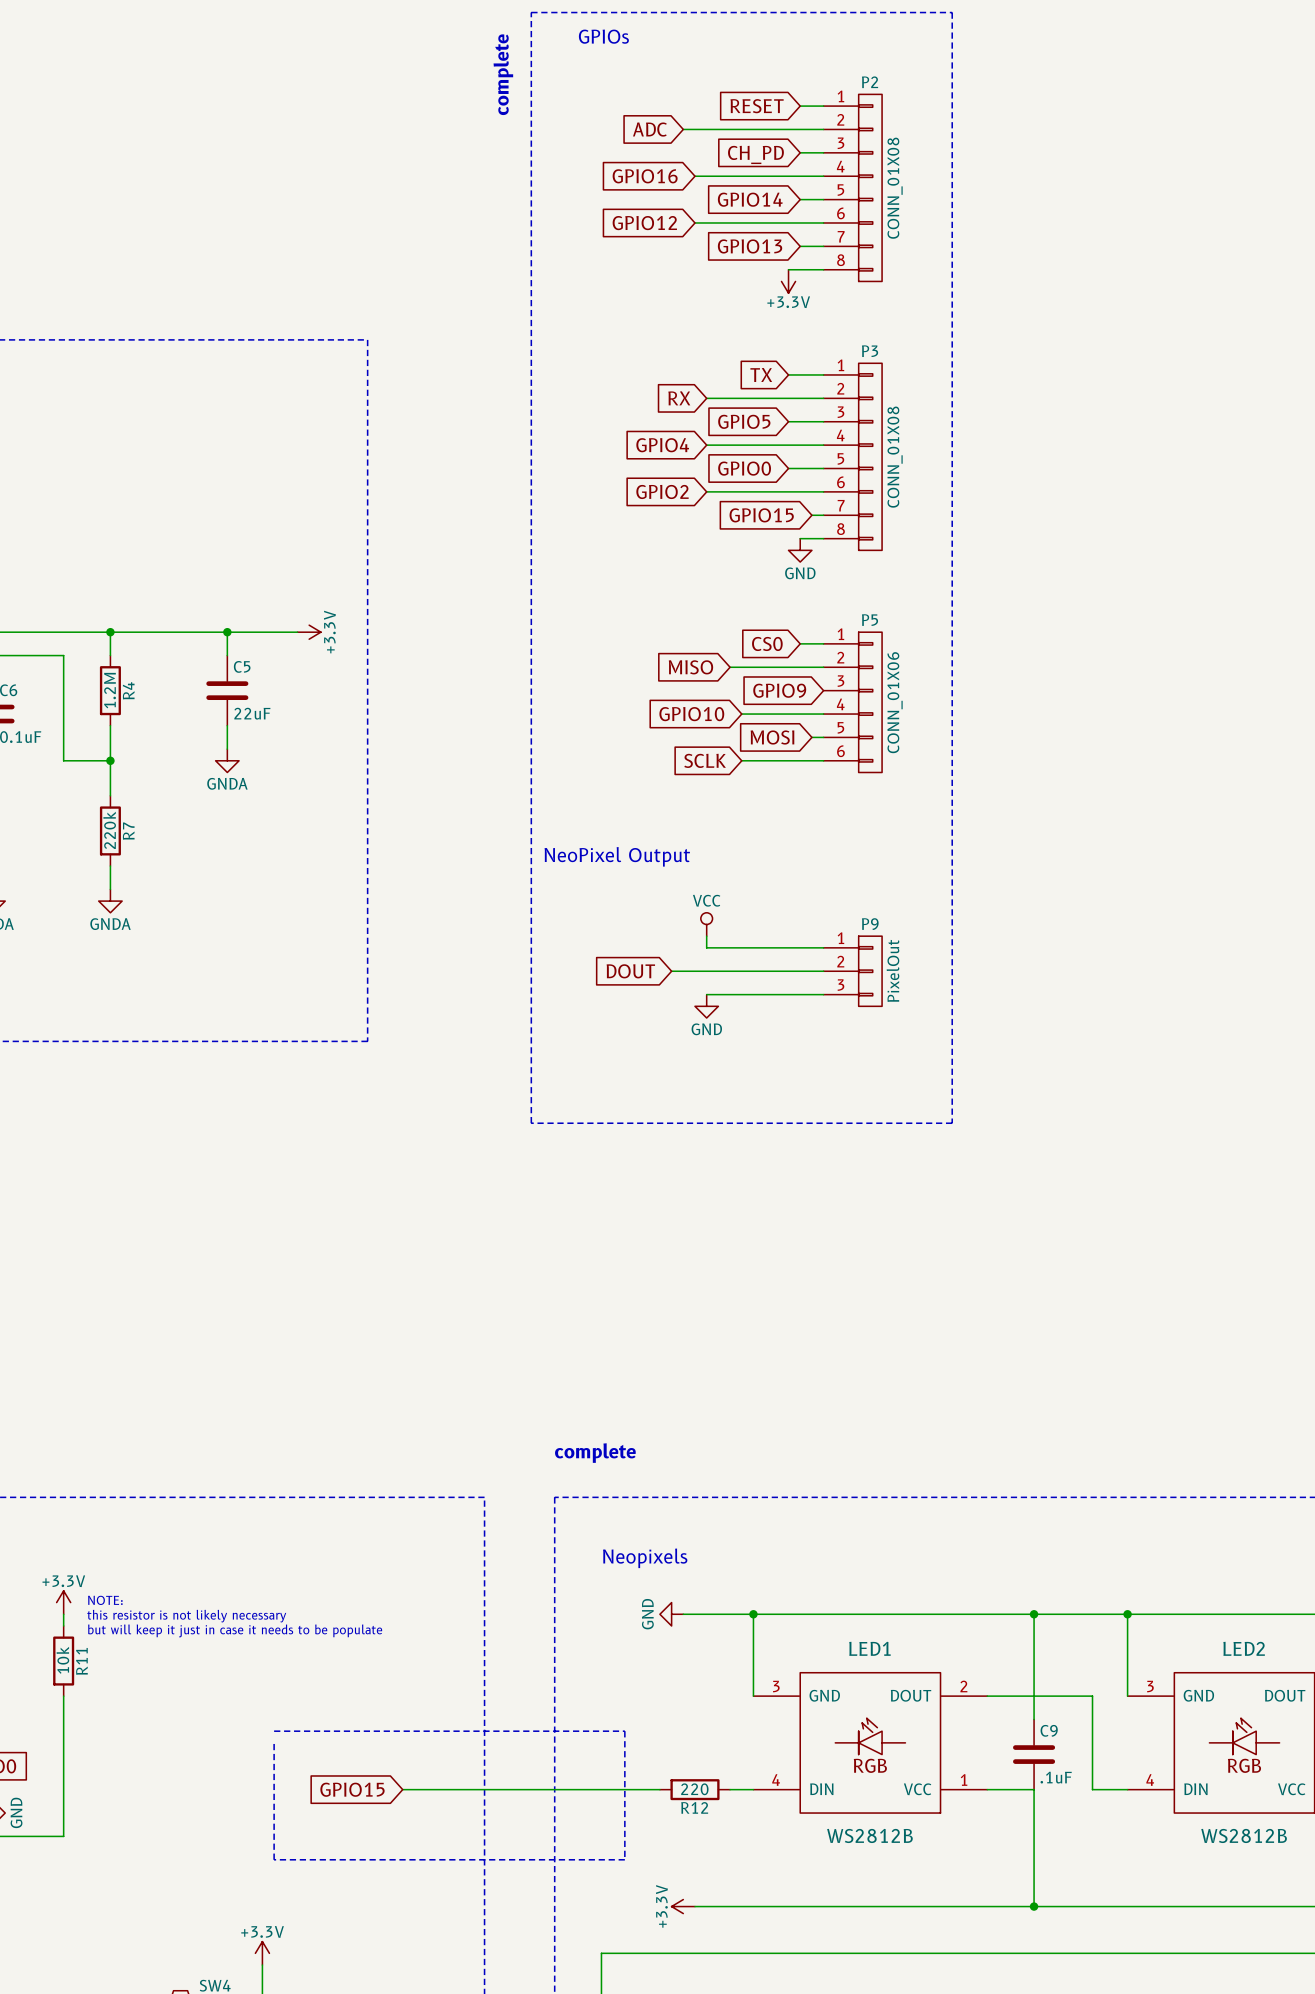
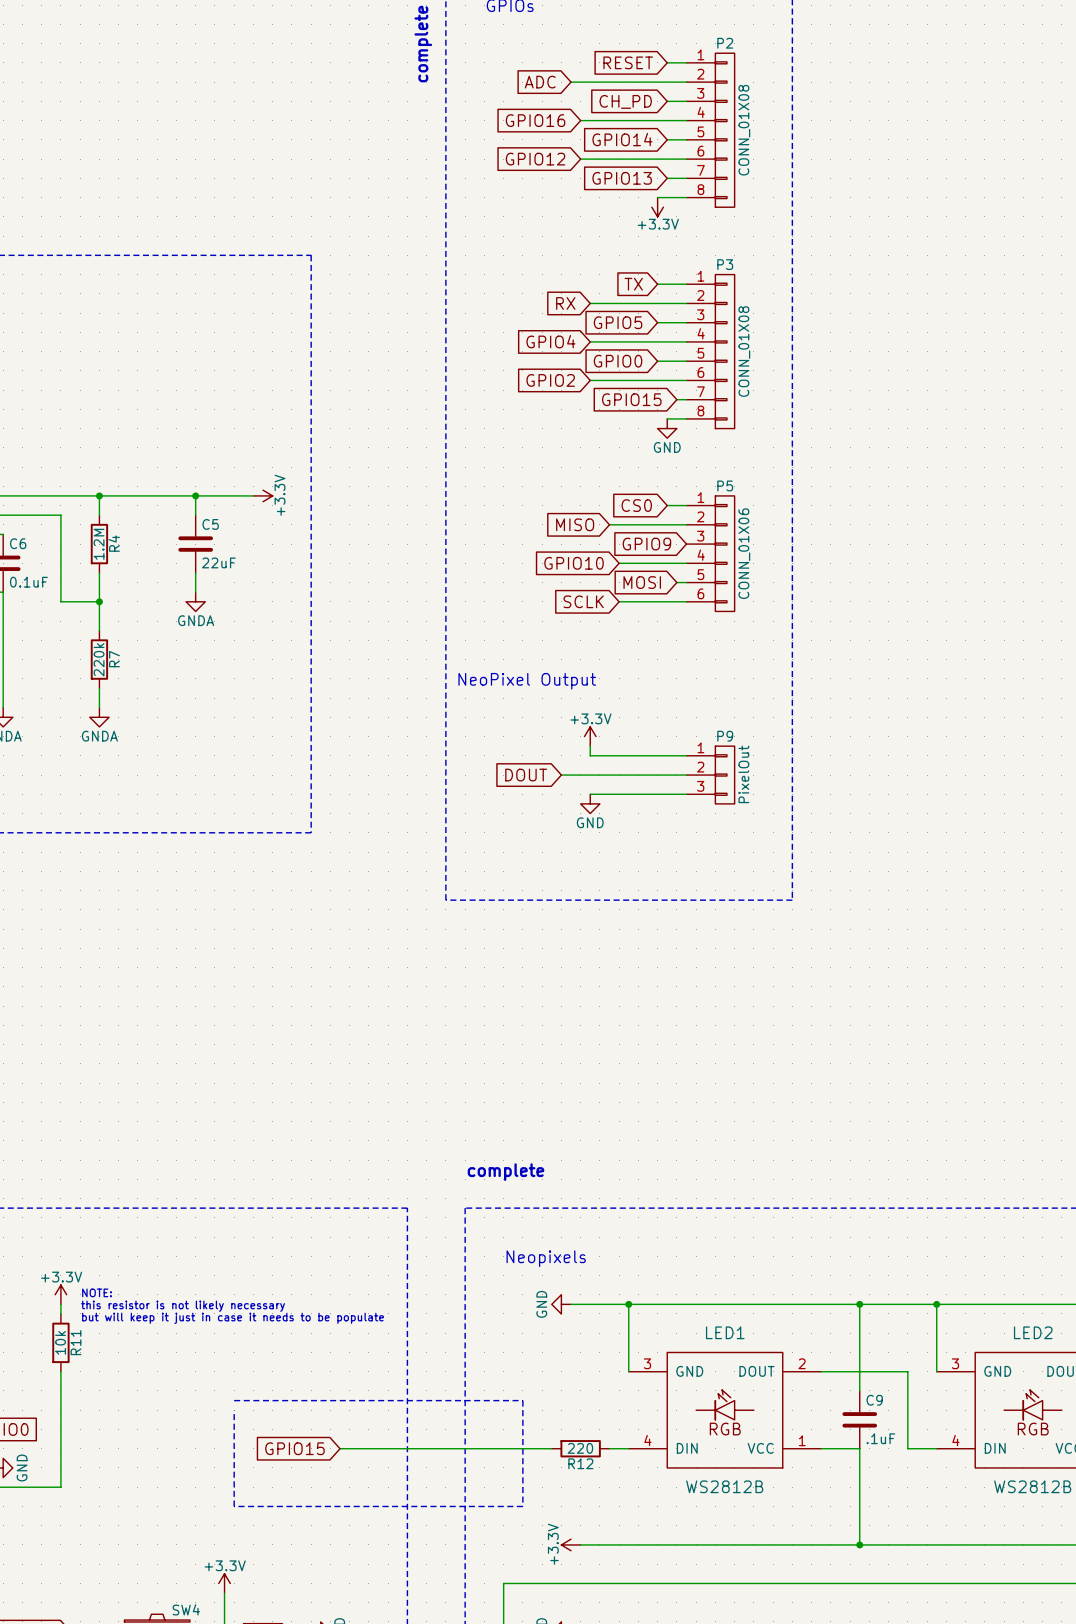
power symbol: VCC (706, 924) -> +3.3V (590, 736)

